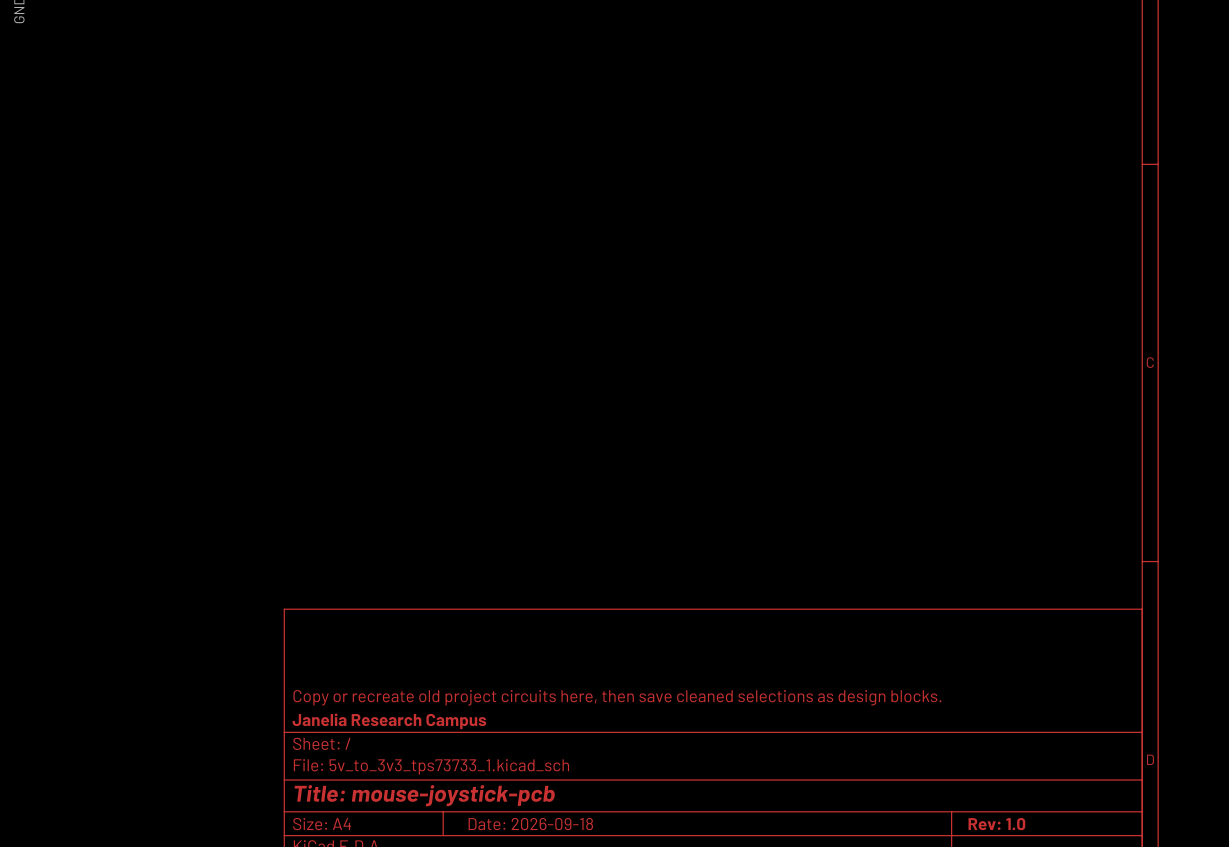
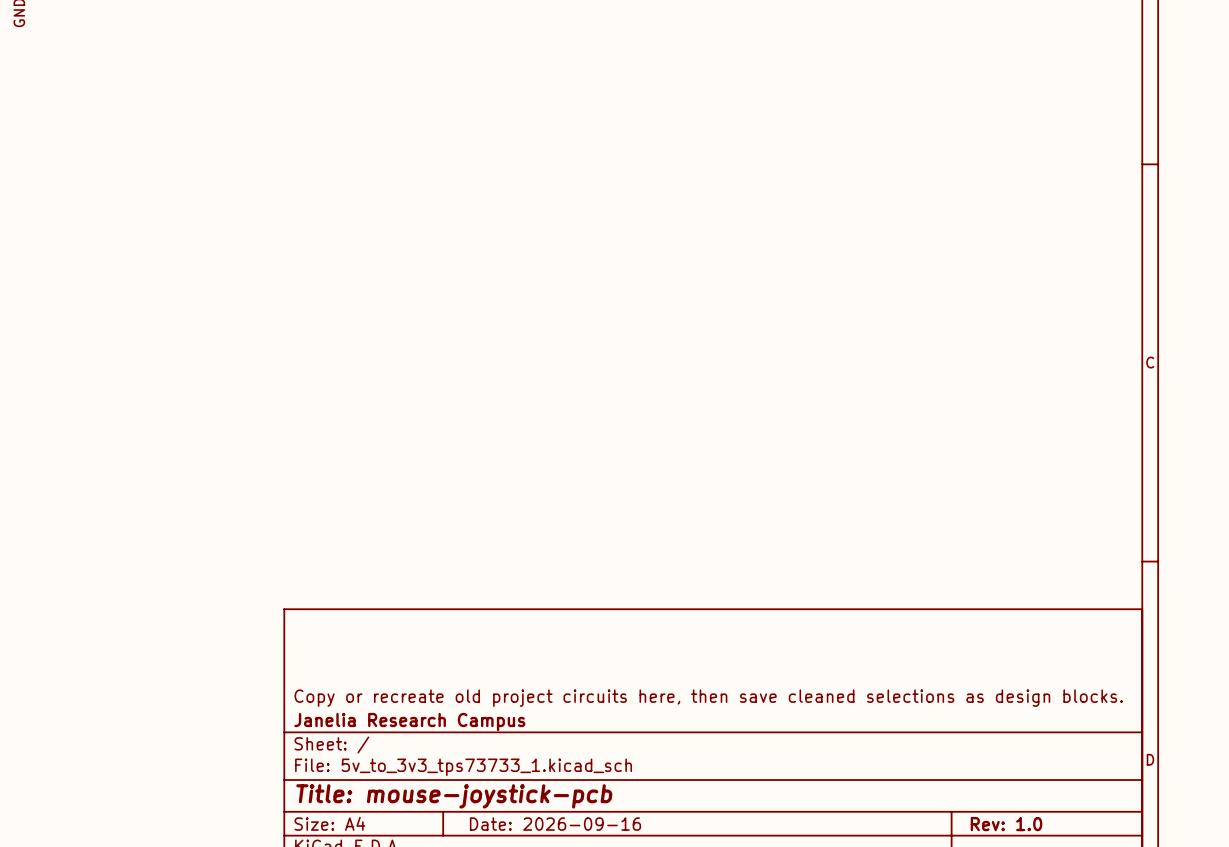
title block: Date: 2026-09-18 (530, 824) -> Date: 2026-09-16 (555, 824)

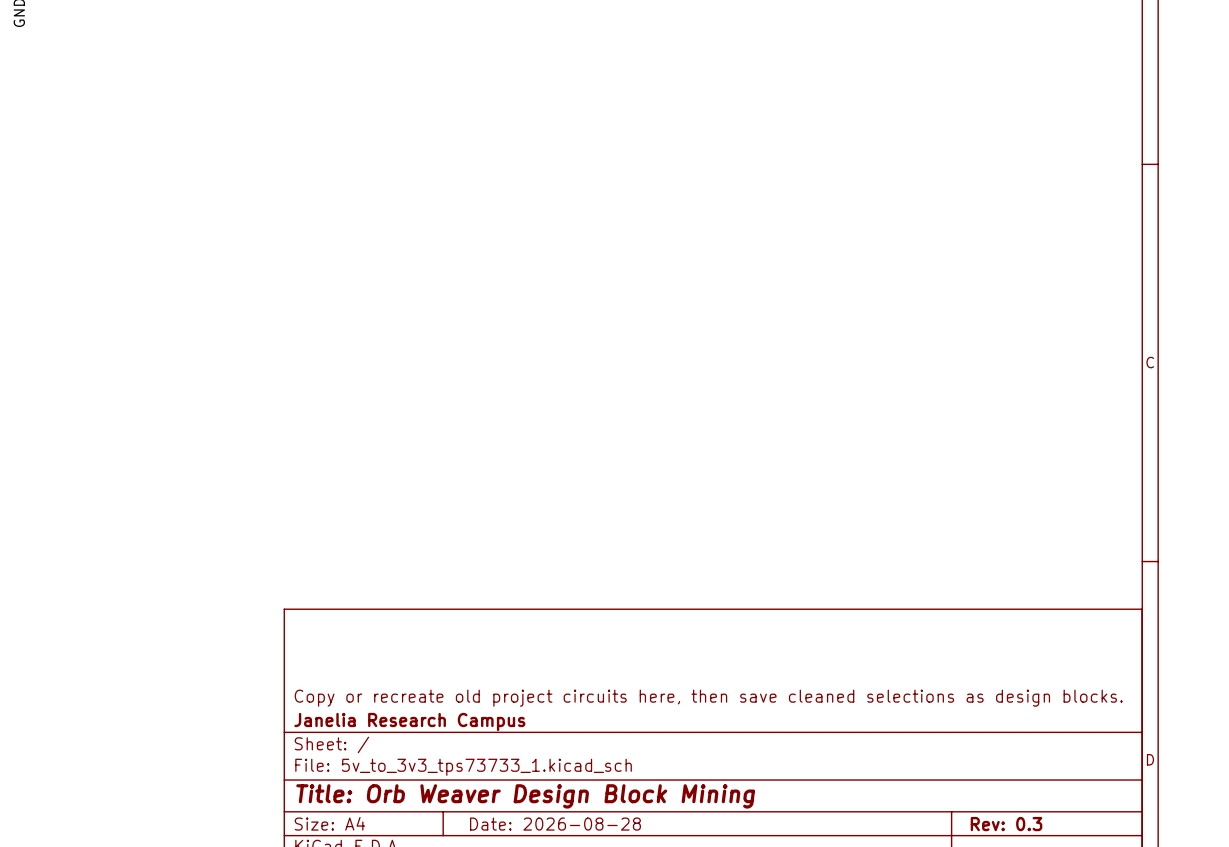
title block: Title: mouse-joystick-pcb (454, 796) -> Title: Orb Weaver Design Block Mining (525, 796)
title block: Date: 2026-09-16 (555, 824) -> Date: 2026-08-28 (555, 824)
title block: Rev: 1.0 (1006, 824) -> Rev: 0.3 (1006, 824)

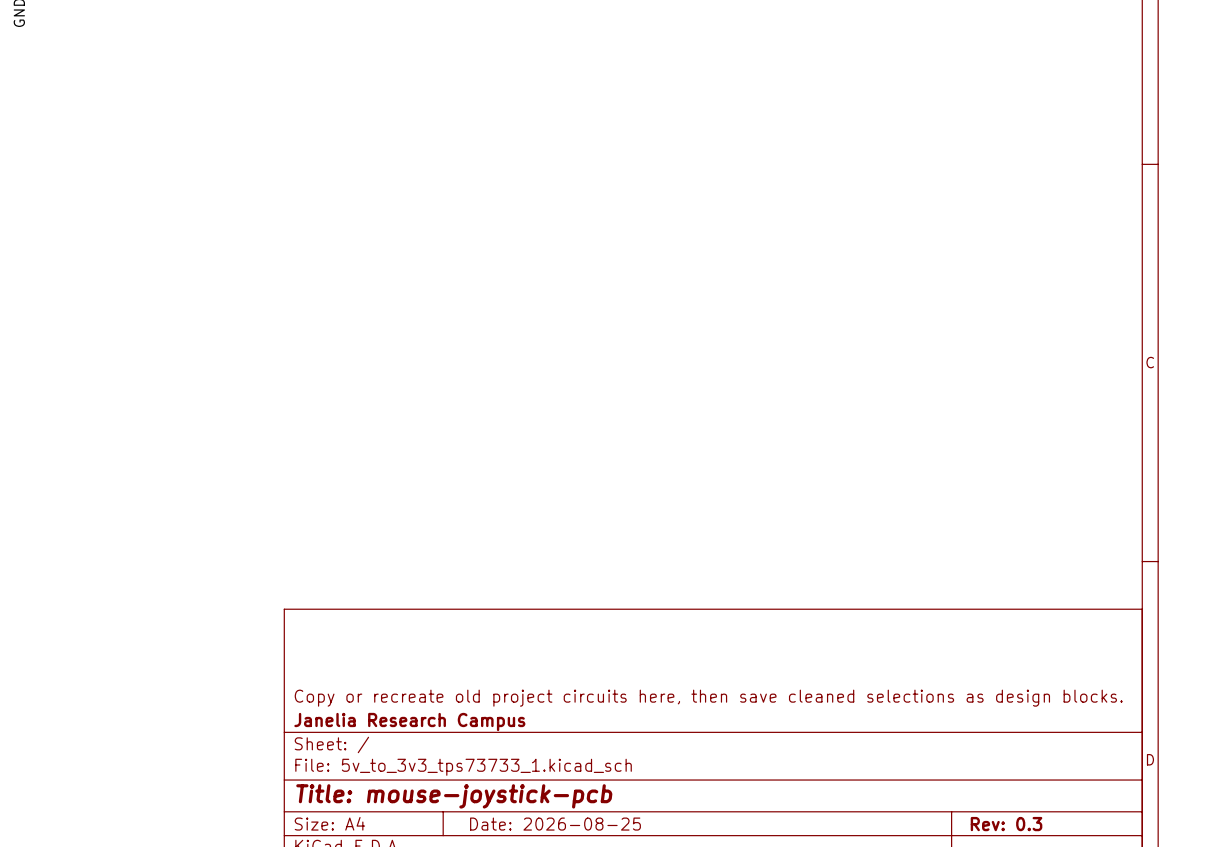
title block: Title: Orb Weaver Design Block Mining (525, 796) -> Title: mouse-joystick-pcb (454, 796)
title block: Date: 2026-08-28 (555, 824) -> Date: 2026-08-25 (555, 824)

